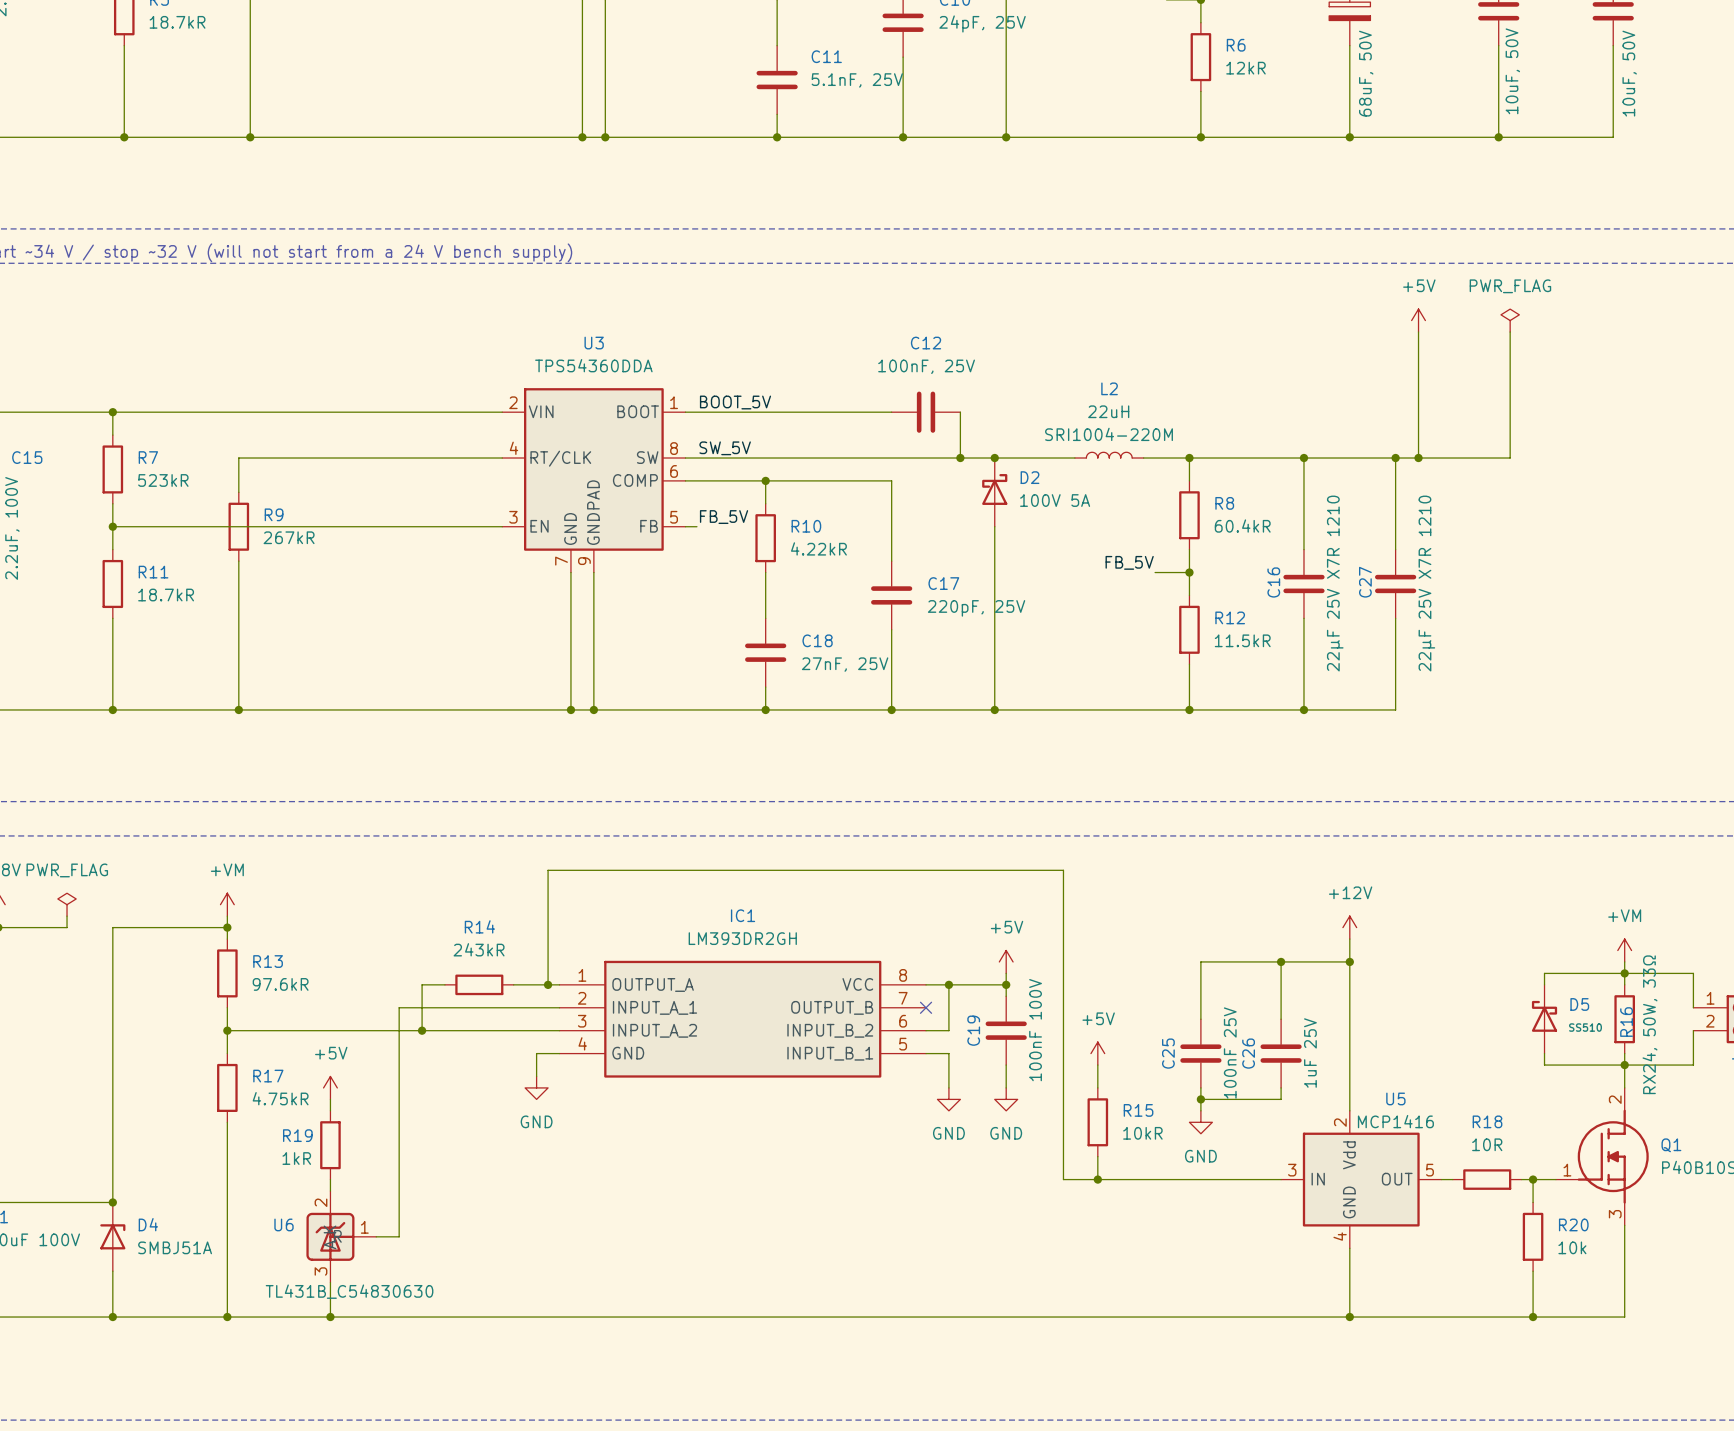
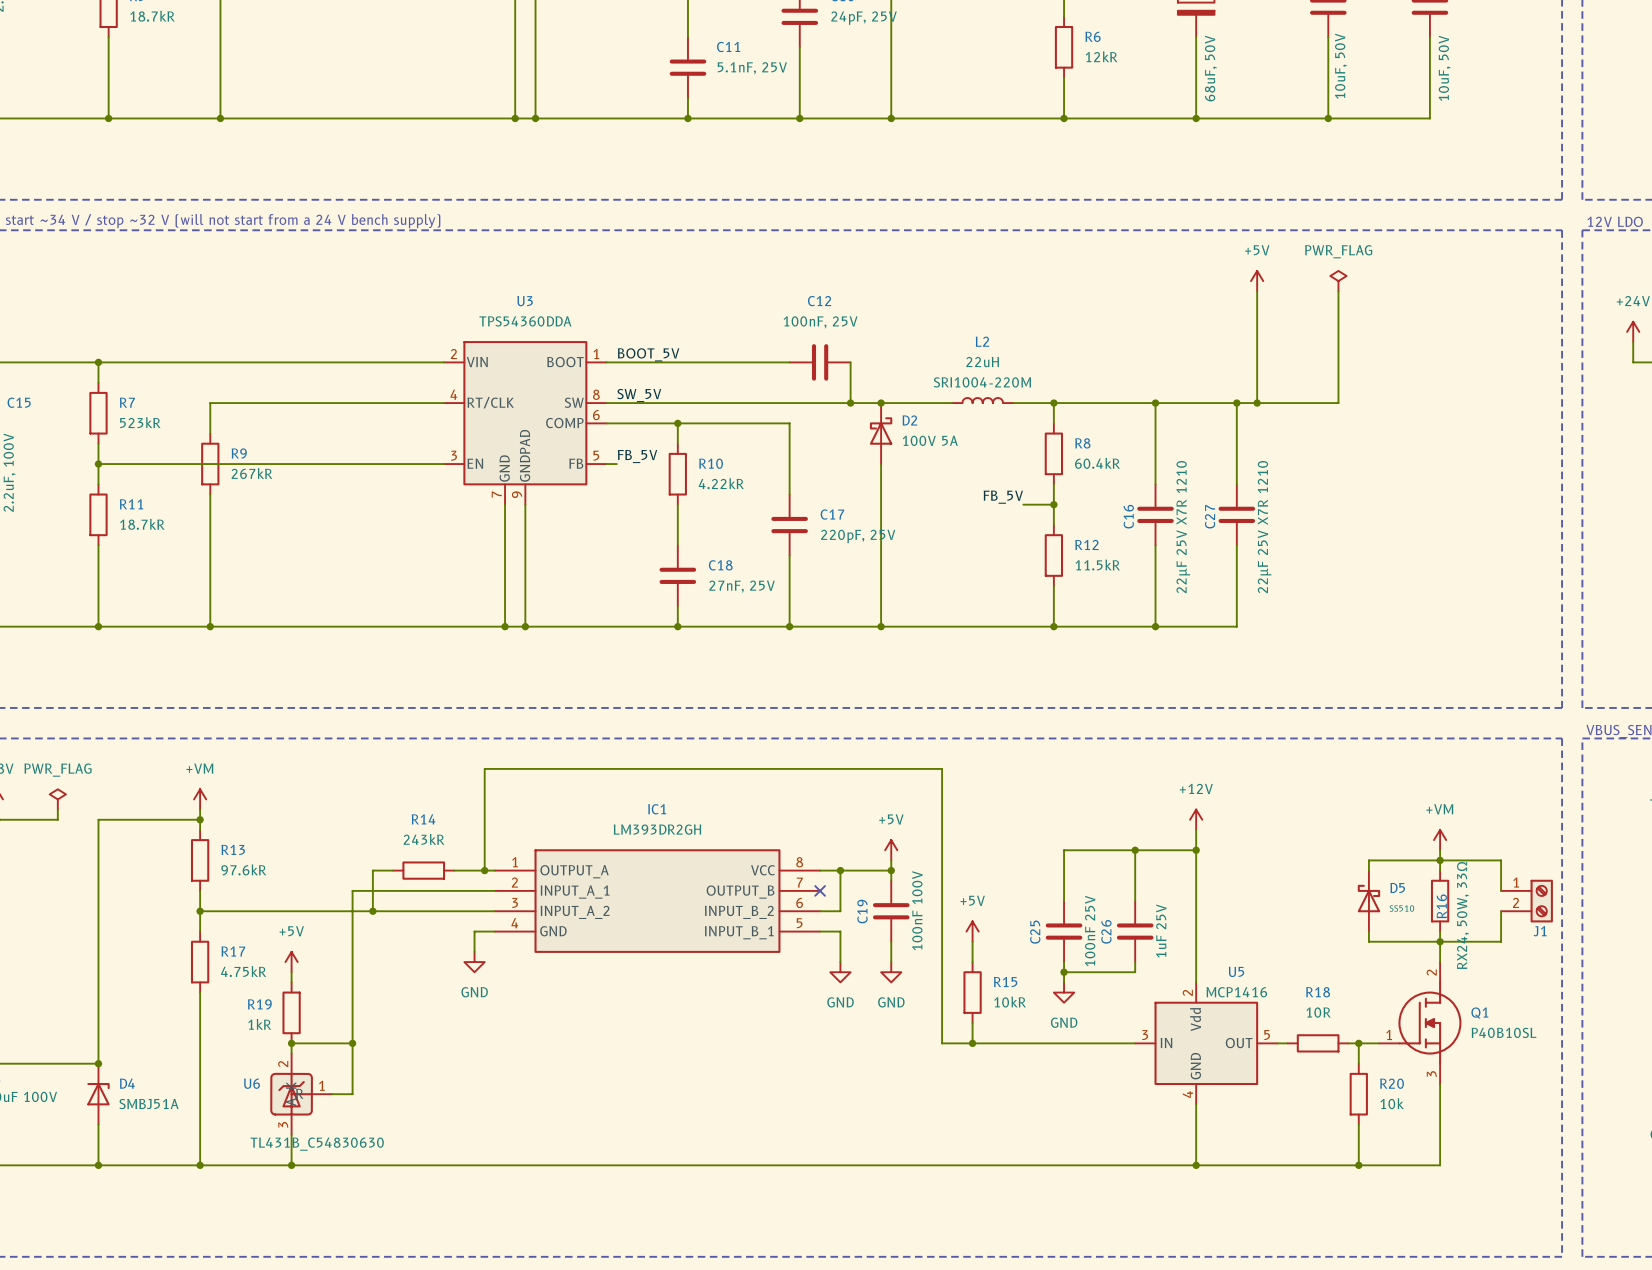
wire: none -> (291, 1043) (352, 1043)
junction: none -> (291, 1043)
junction: none -> (352, 1043)

